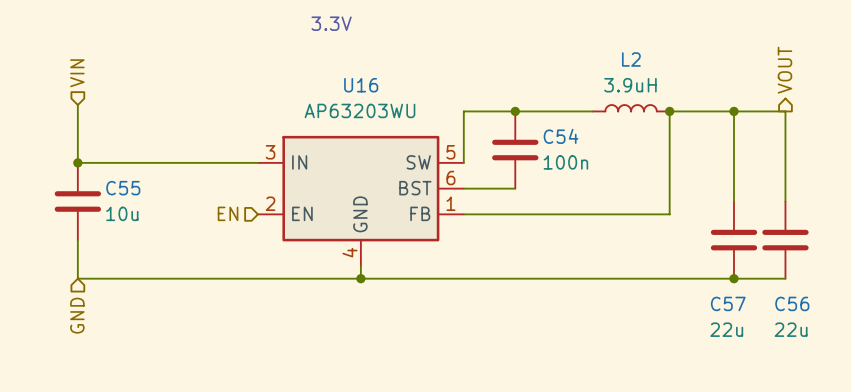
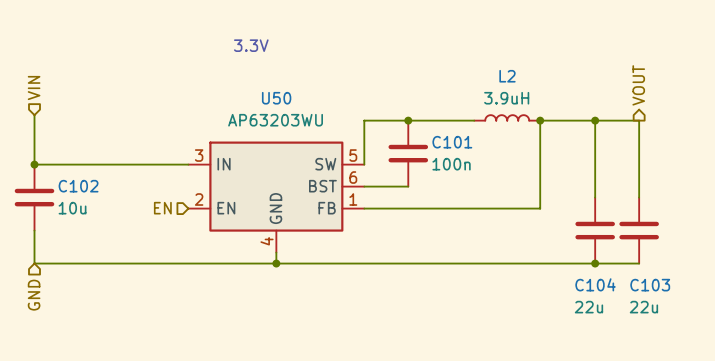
U16 name: U16 (361, 85) -> U50 (276, 98)
C54 name: C54 (561, 136) -> C101 (452, 142)
C55 name: C55 (123, 188) -> C102 (78, 186)
C57 name: C57 (728, 303) -> C104 (595, 284)
C56 name: C56 (792, 303) -> C103 (650, 285)

